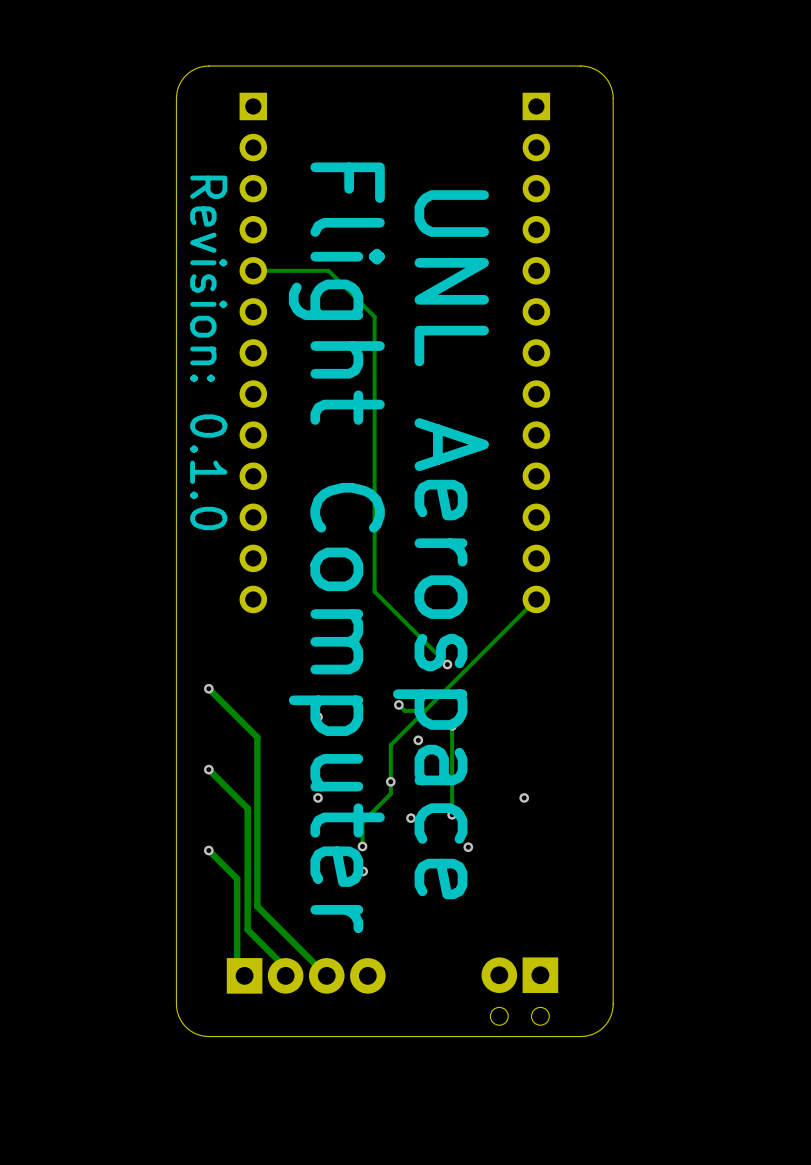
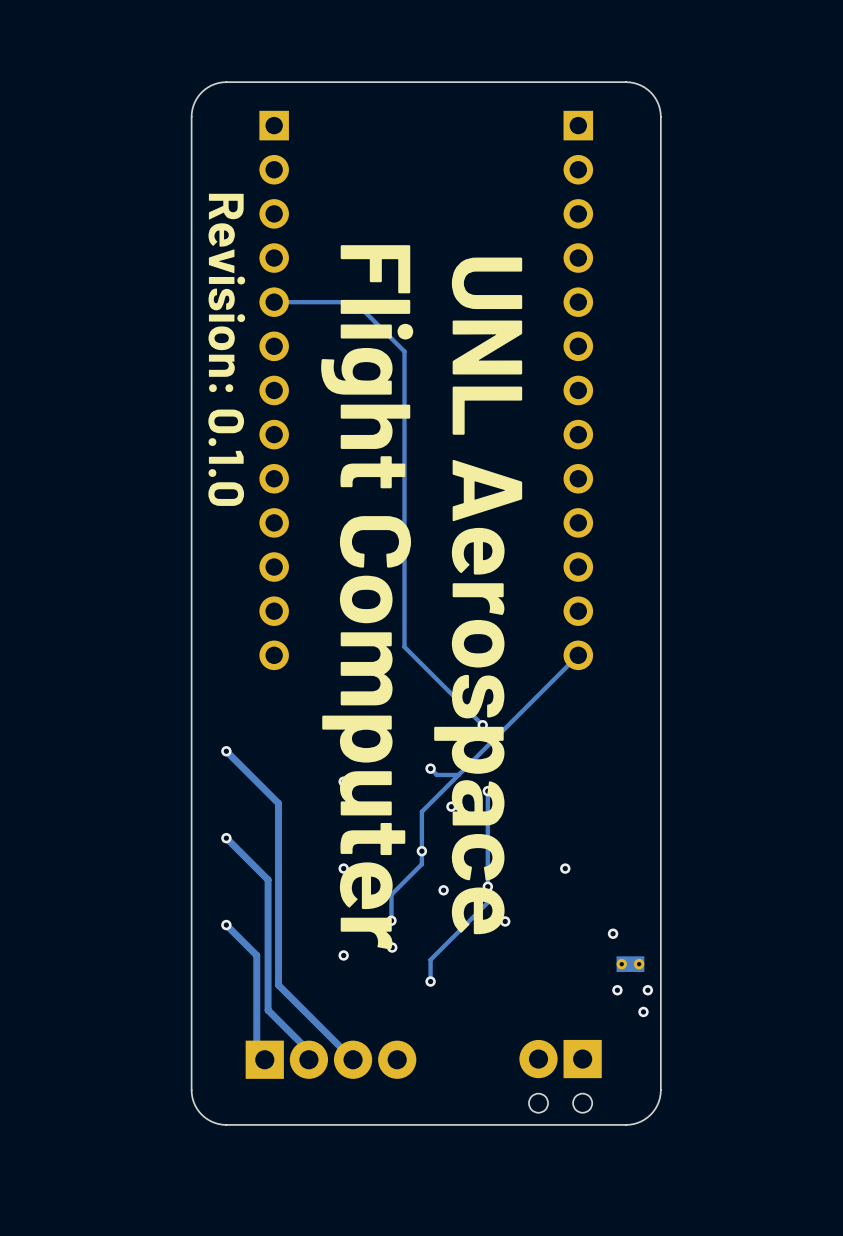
track: none -> (487, 886) (487, 902) (430, 959) (430, 981)
via: none -> (613, 933)
part: none -> (630, 964)
via: none -> (430, 981)
via: none -> (617, 990)
via: none -> (647, 990)
via: none -> (643, 1011)

